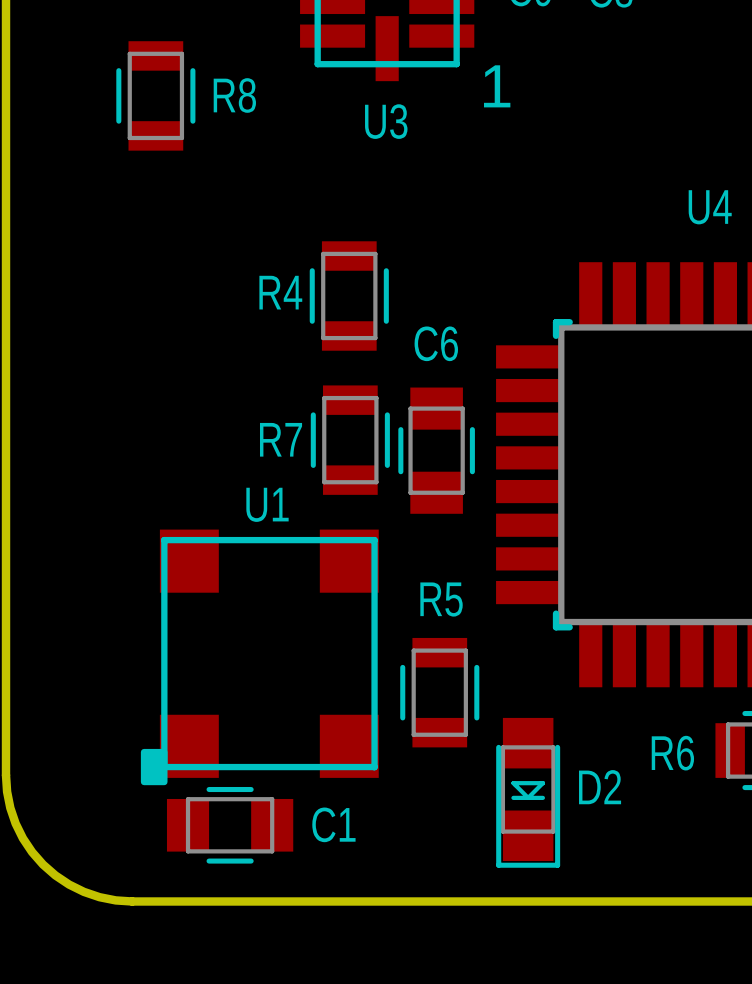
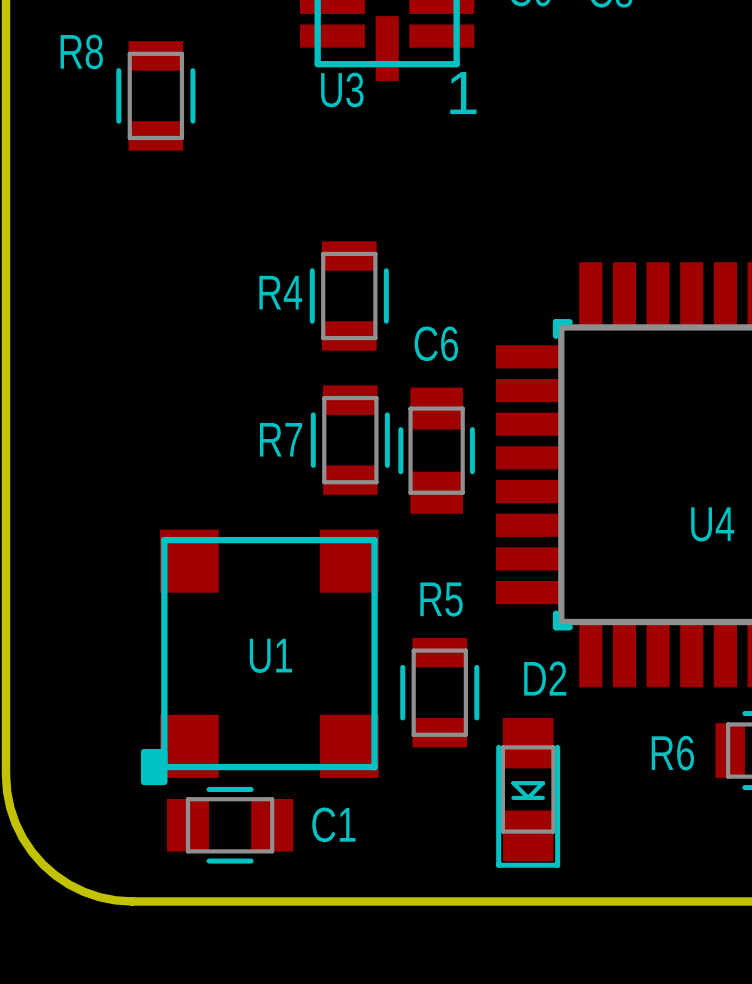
U3 text position: 1 (497, 86) -> 1 (463, 93)
R8 name position: R8 (234, 95) -> R8 (81, 51)
U3 name position: U3 (386, 121) -> U3 (342, 89)
U4 name position: U4 (710, 207) -> U4 (712, 524)
U1 name position: U1 (267, 504) -> U1 (270, 655)
D2 name position: D2 (600, 787) -> D2 (545, 678)

